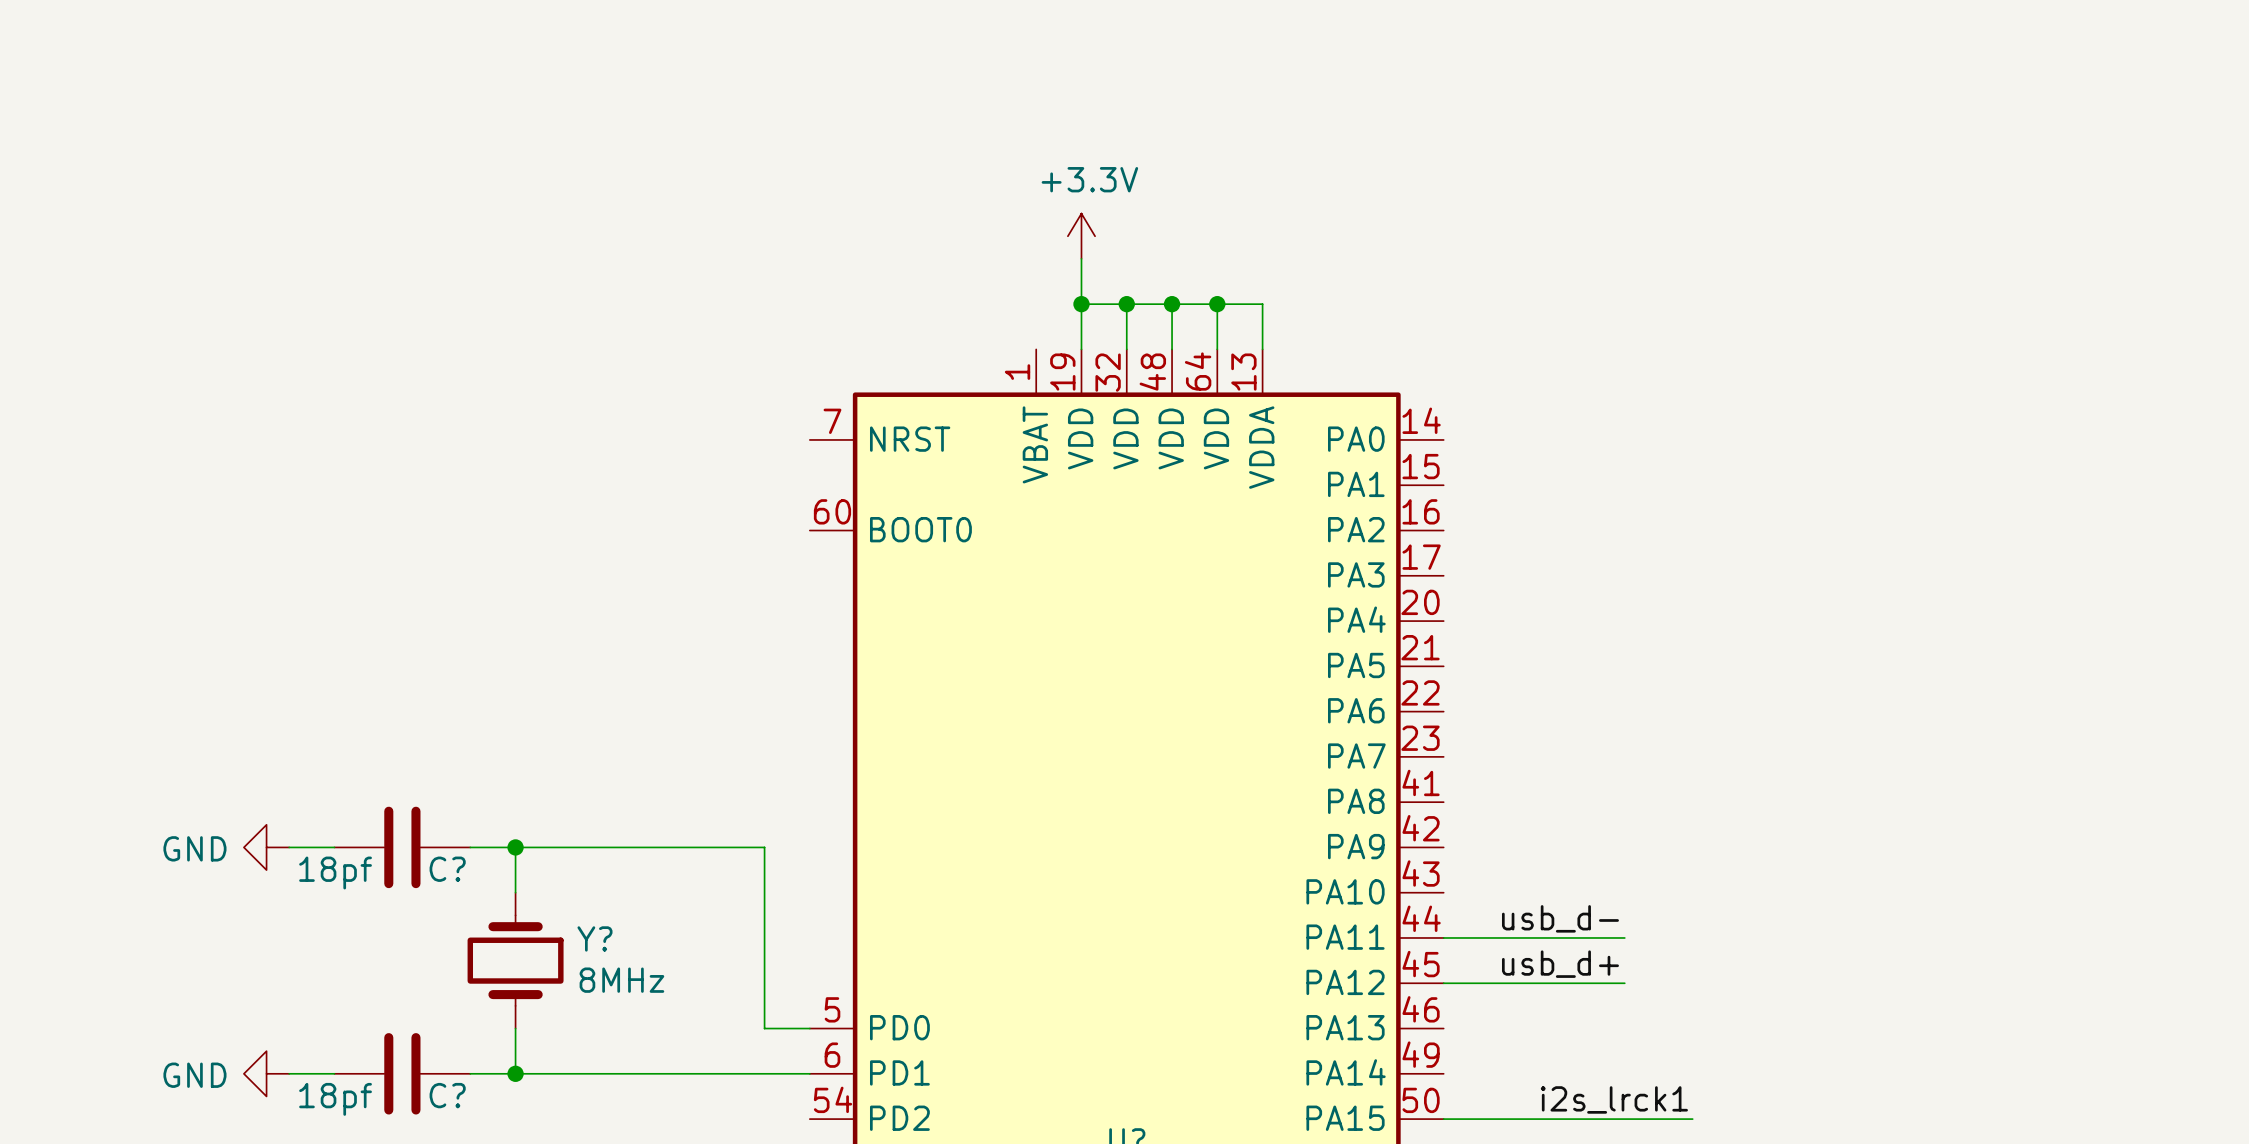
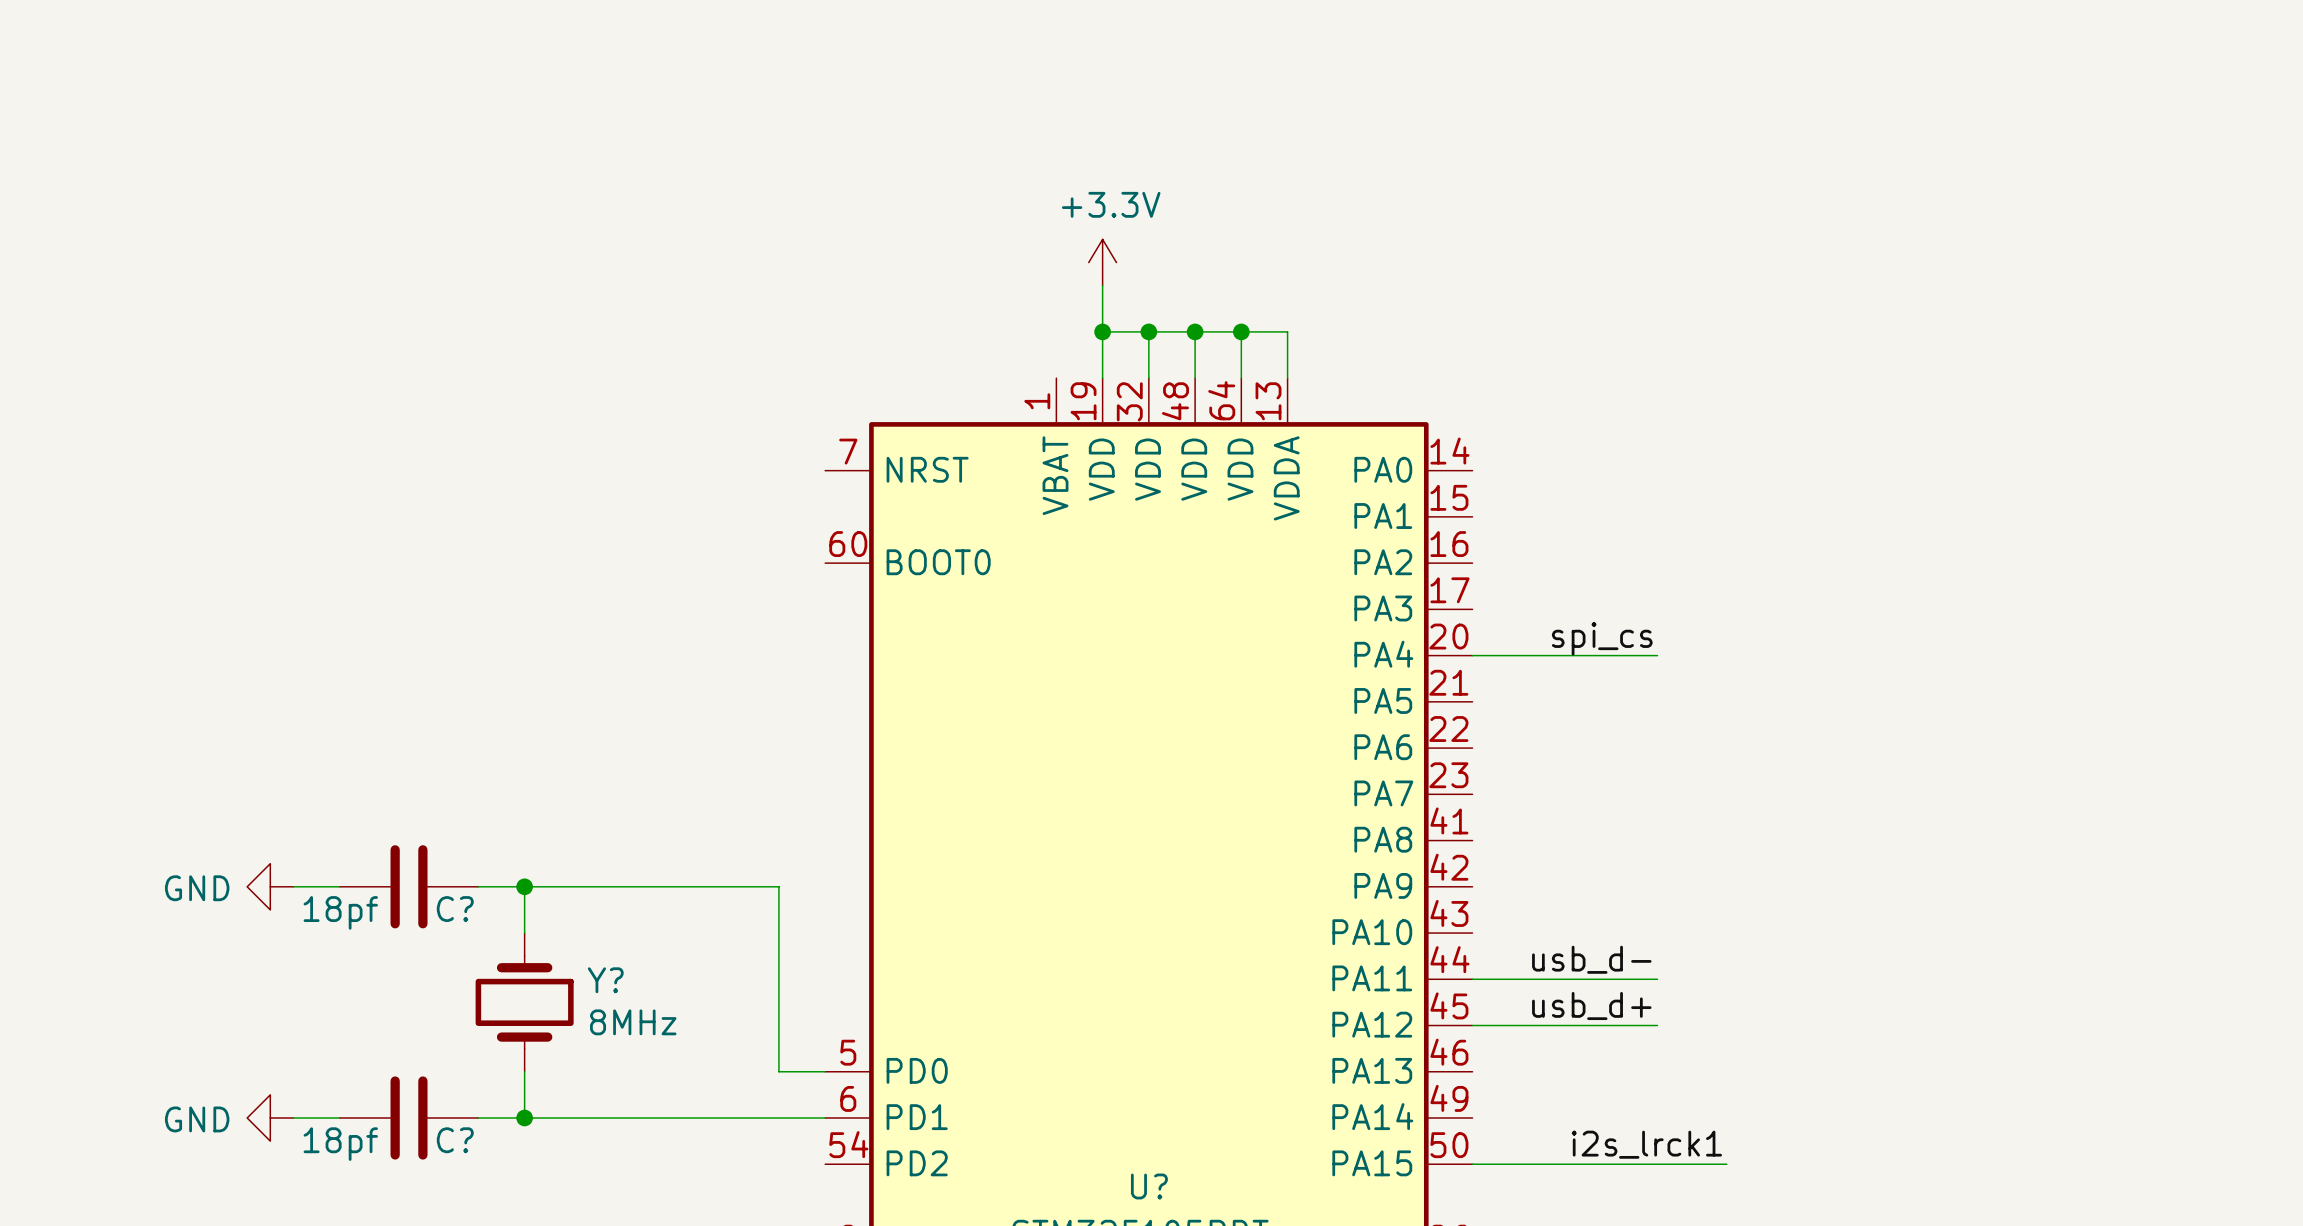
label: none -> spi_cs (1602, 638)
wire: none -> (1472, 655) (1657, 655)

